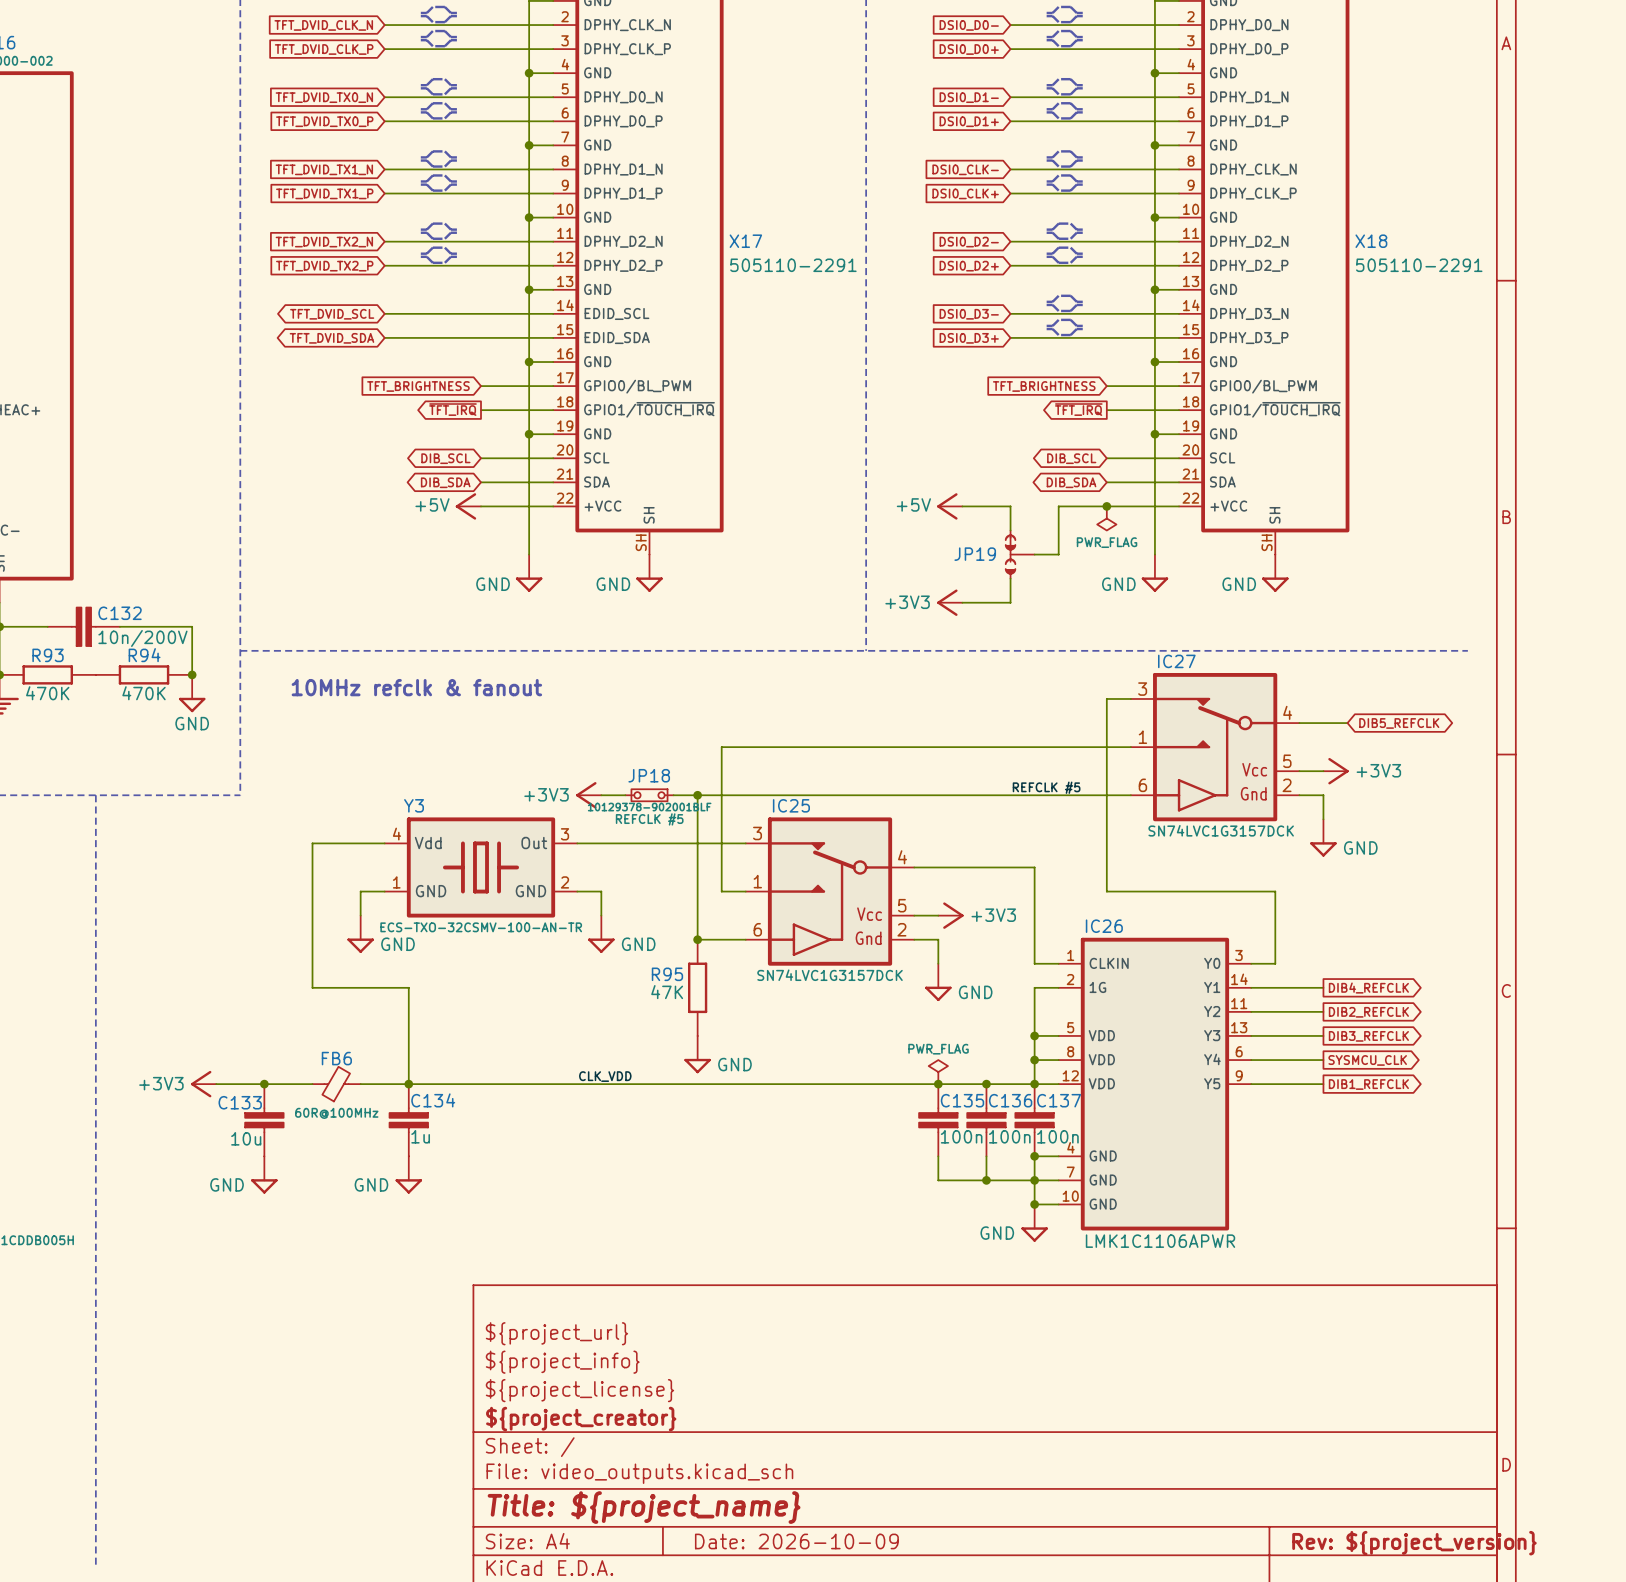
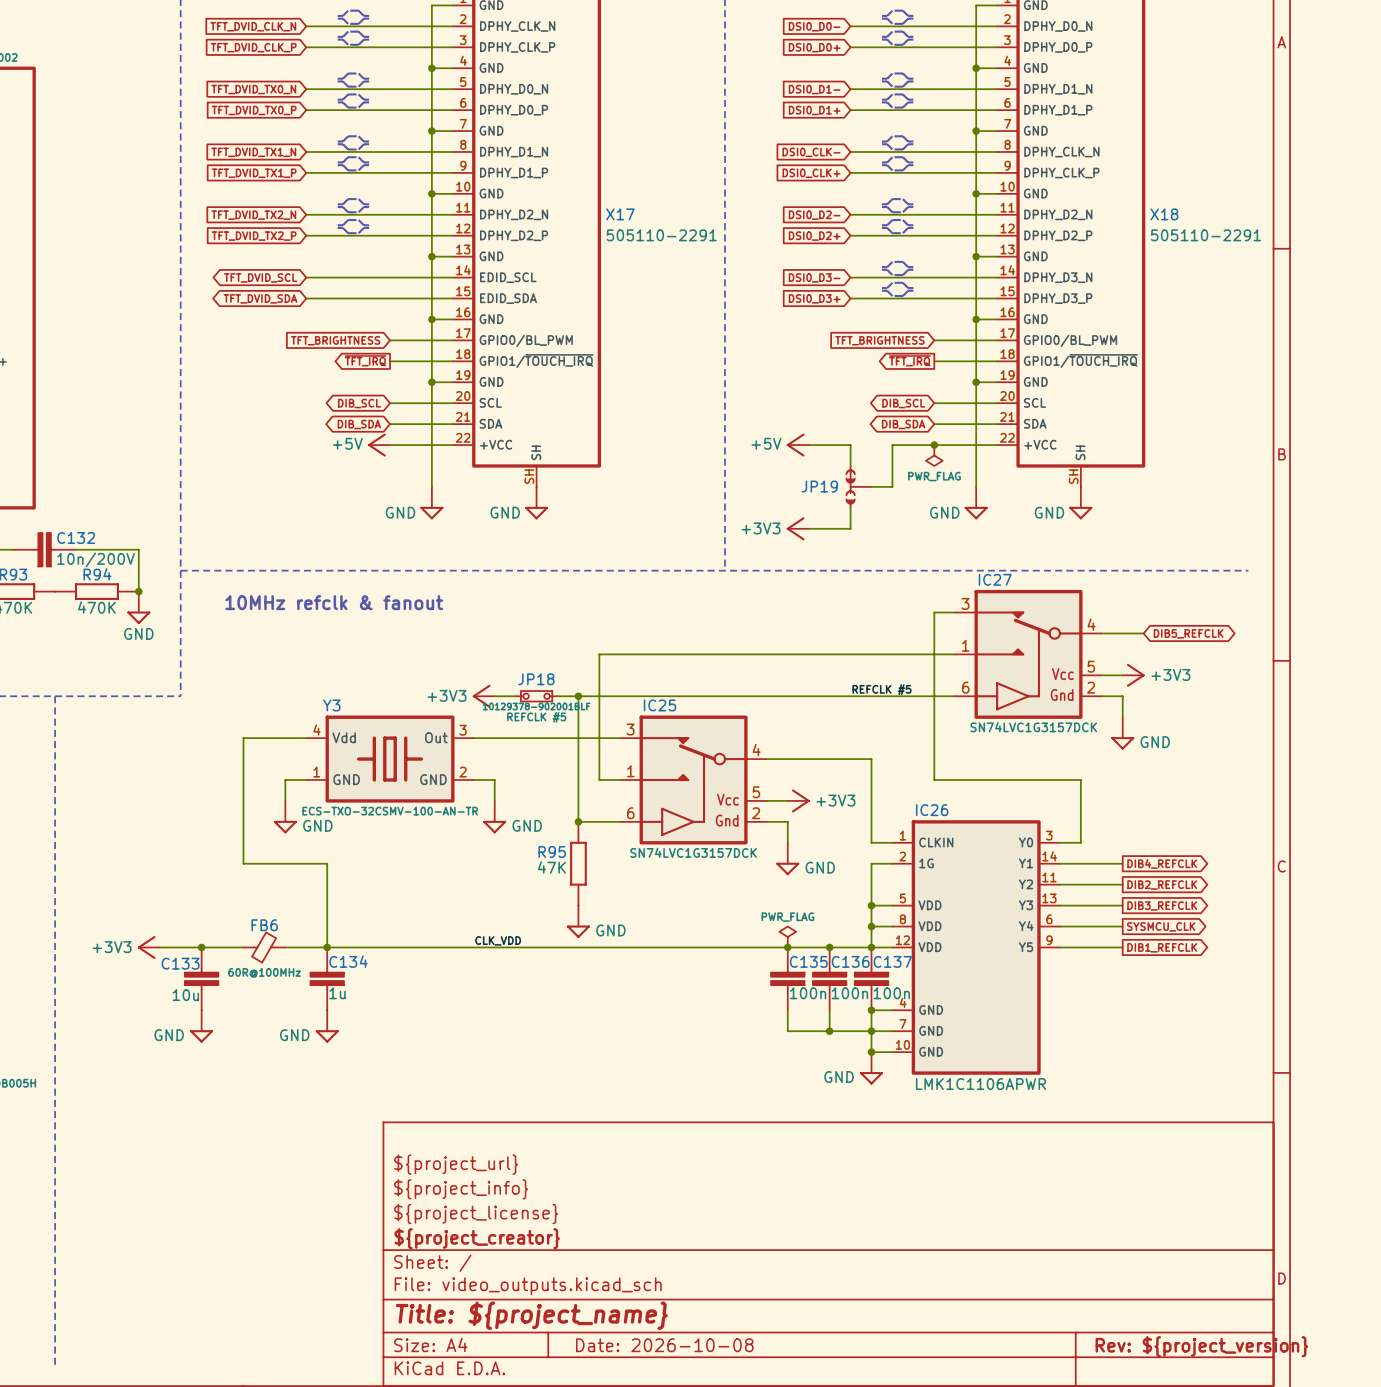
title block: Date: 2026-10-09 (796, 1541) -> Date: 2026-10-08 (664, 1345)

